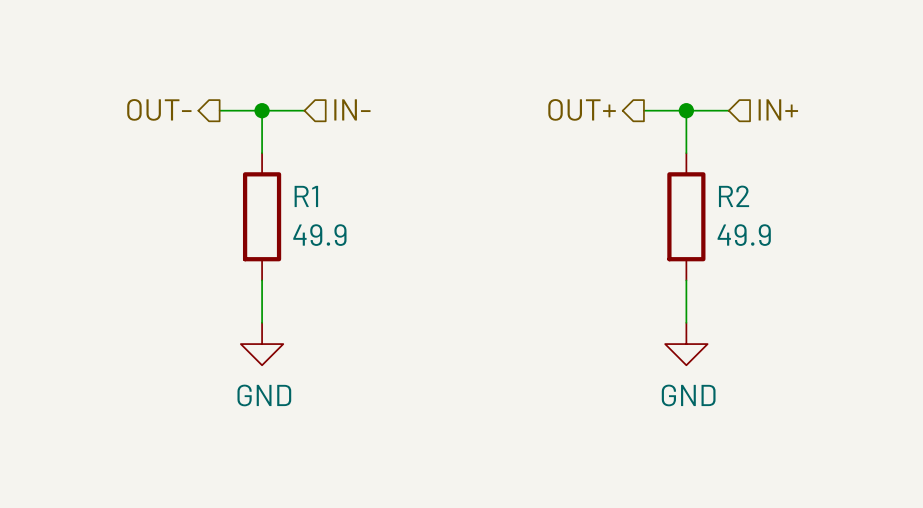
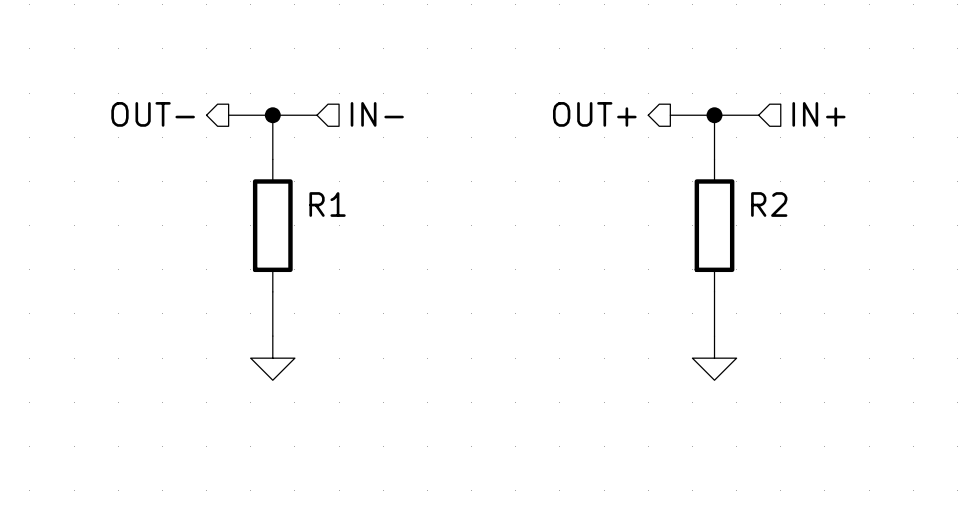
R1 value: 49.9 (319, 235) -> none
R2 value: 49.9 (744, 235) -> none
power symbol text: GND (264, 395) -> none
power symbol text: GND (688, 395) -> none

